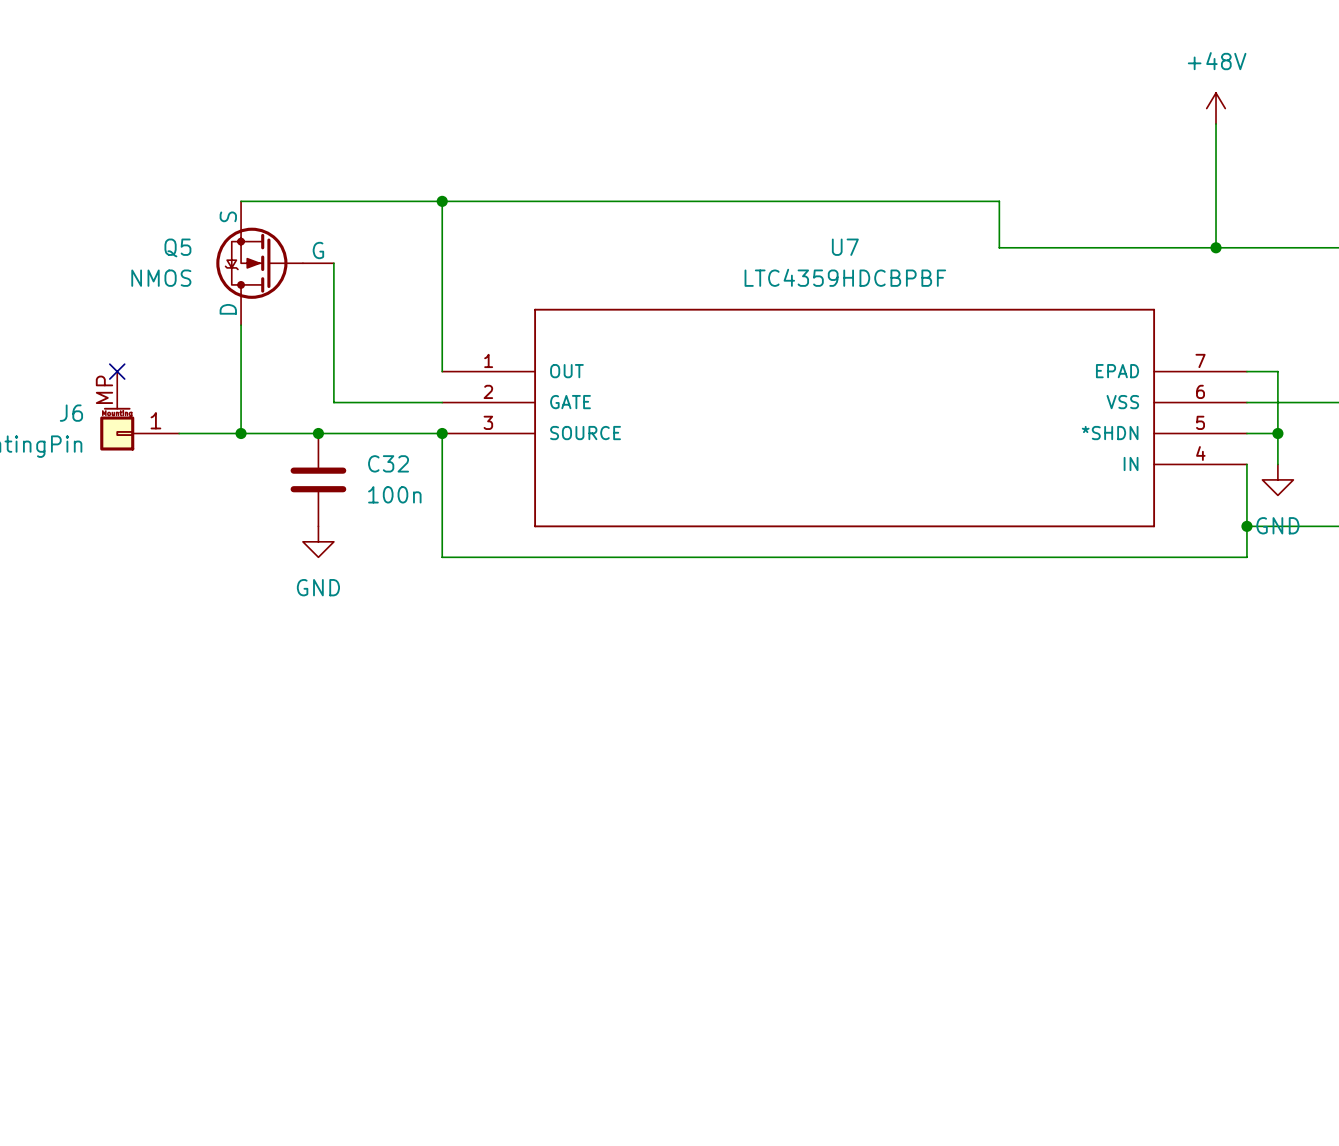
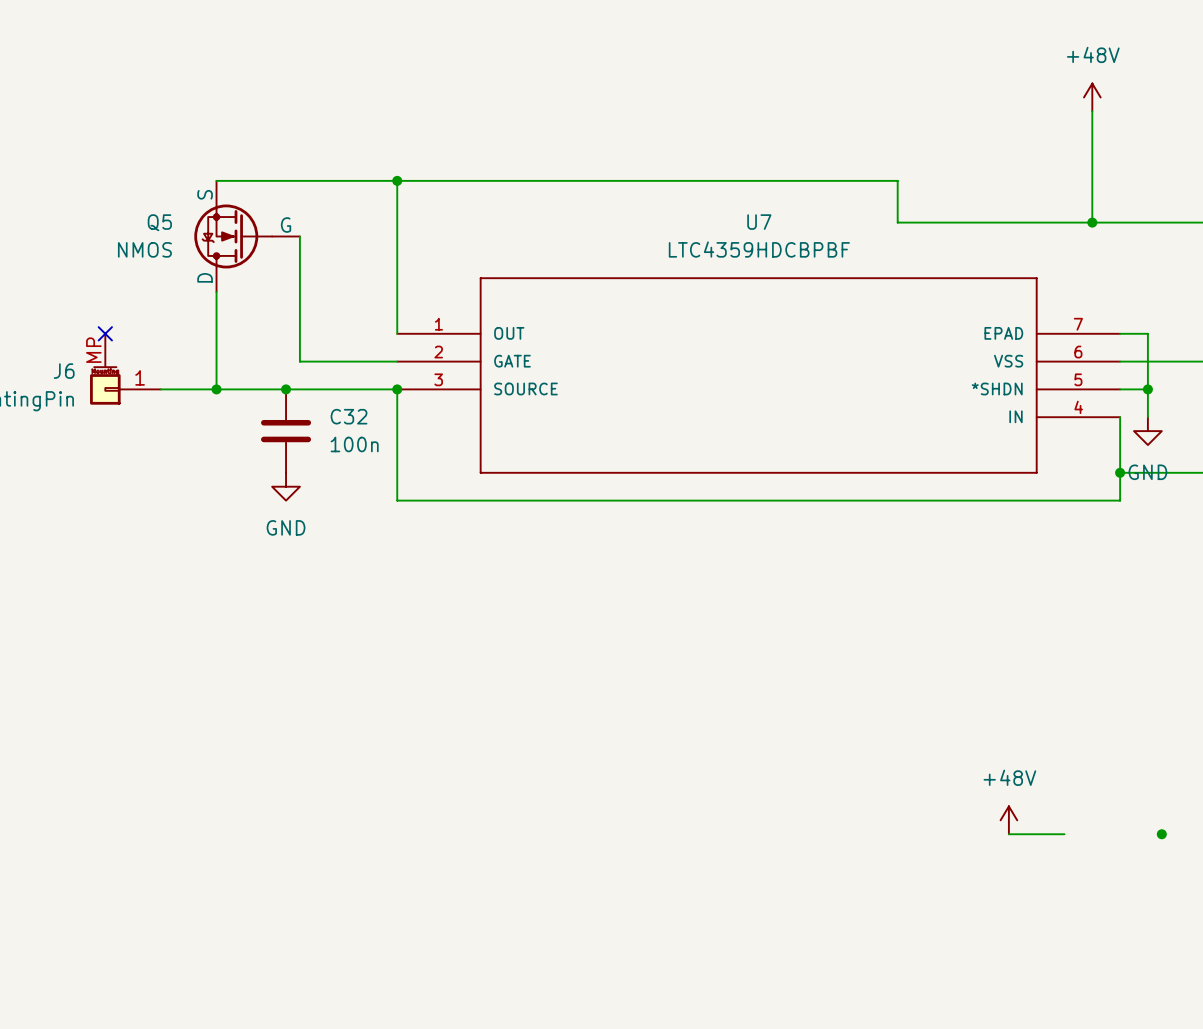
power symbol: none -> +48V (1008, 820)
wire: none -> (1008, 834) (1064, 834)
junction: none -> (1161, 834)

